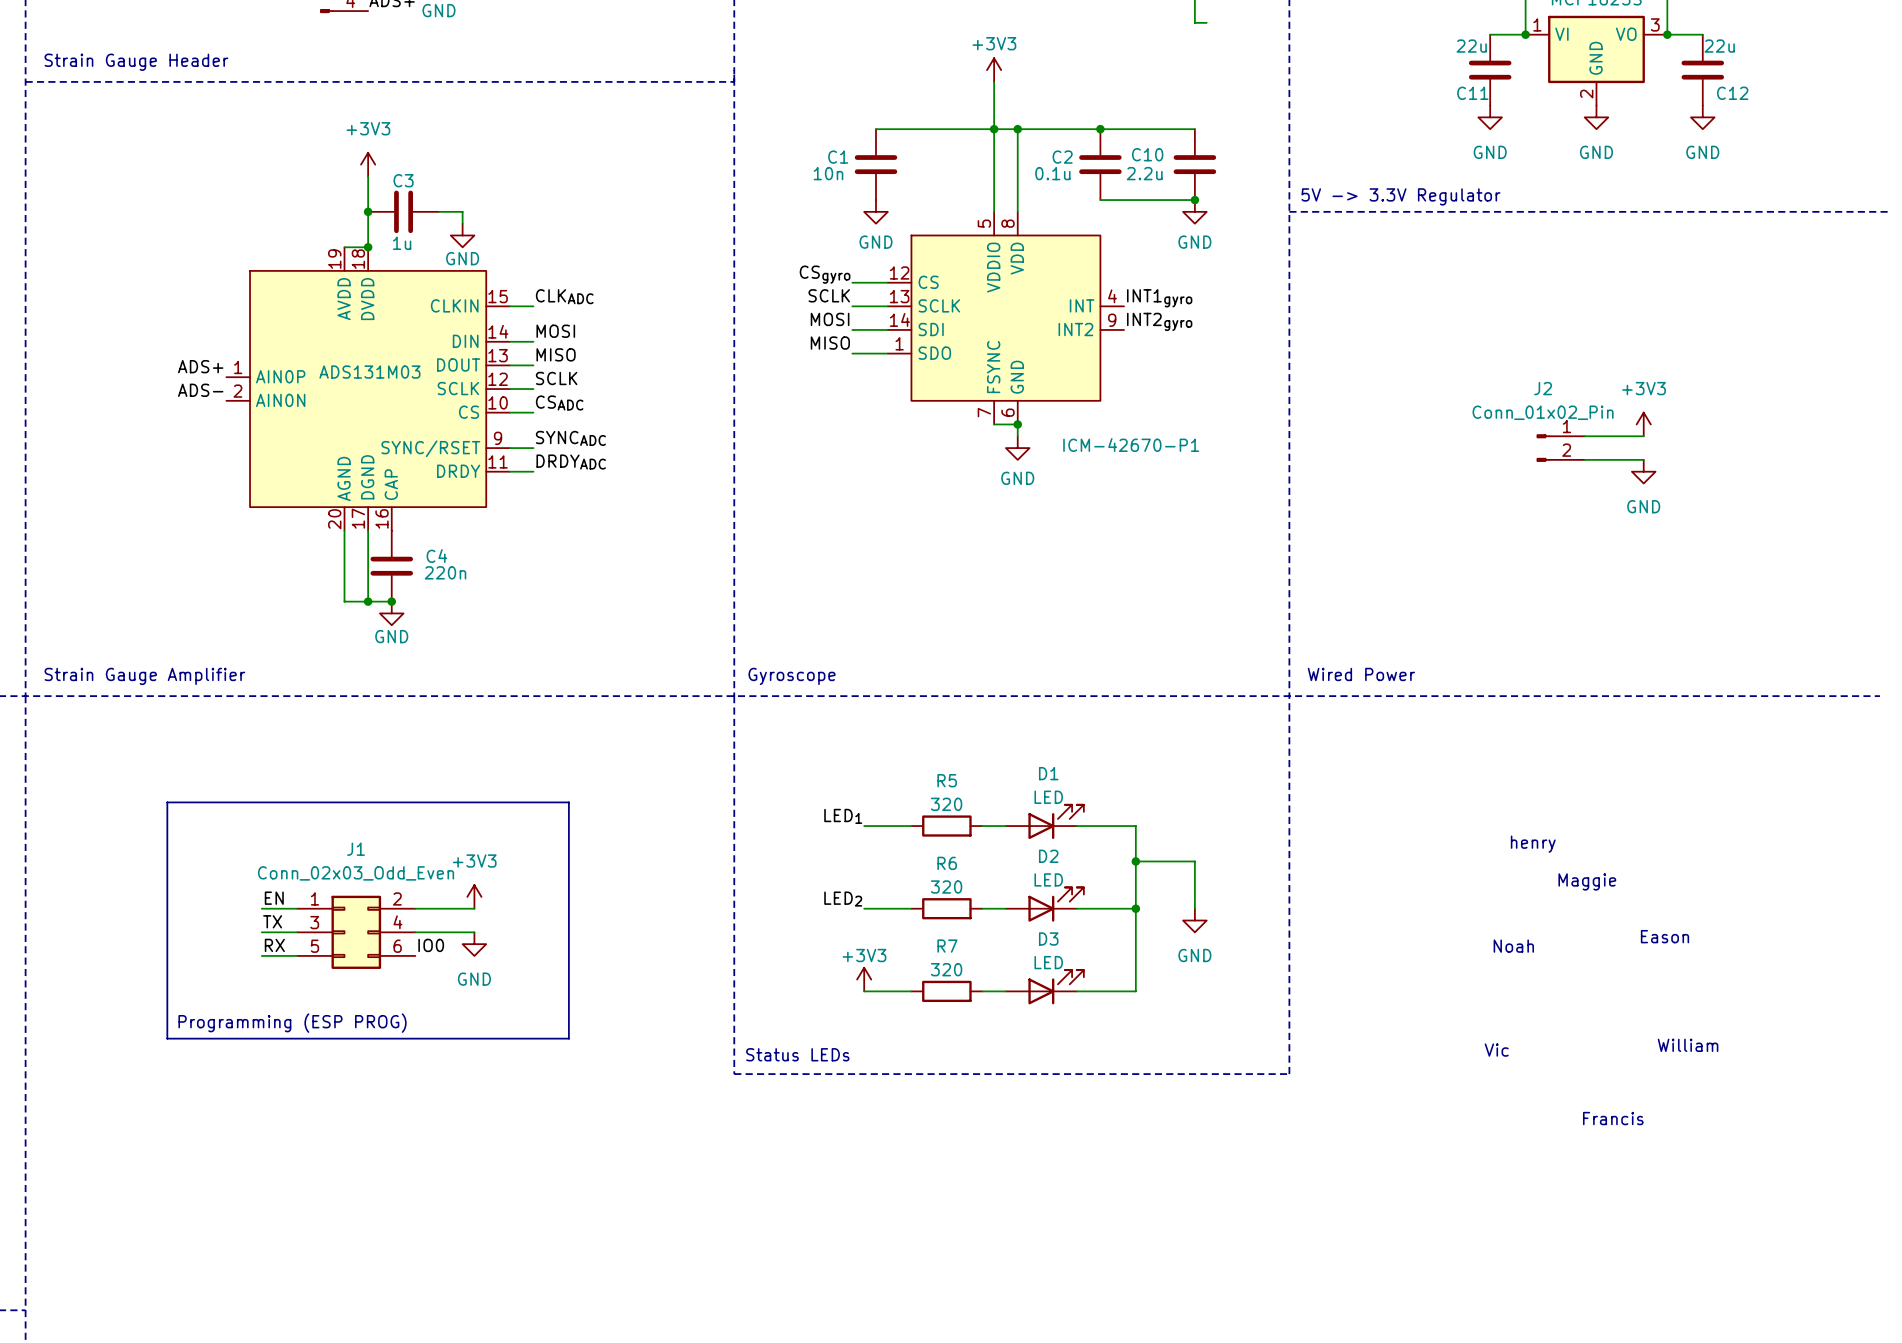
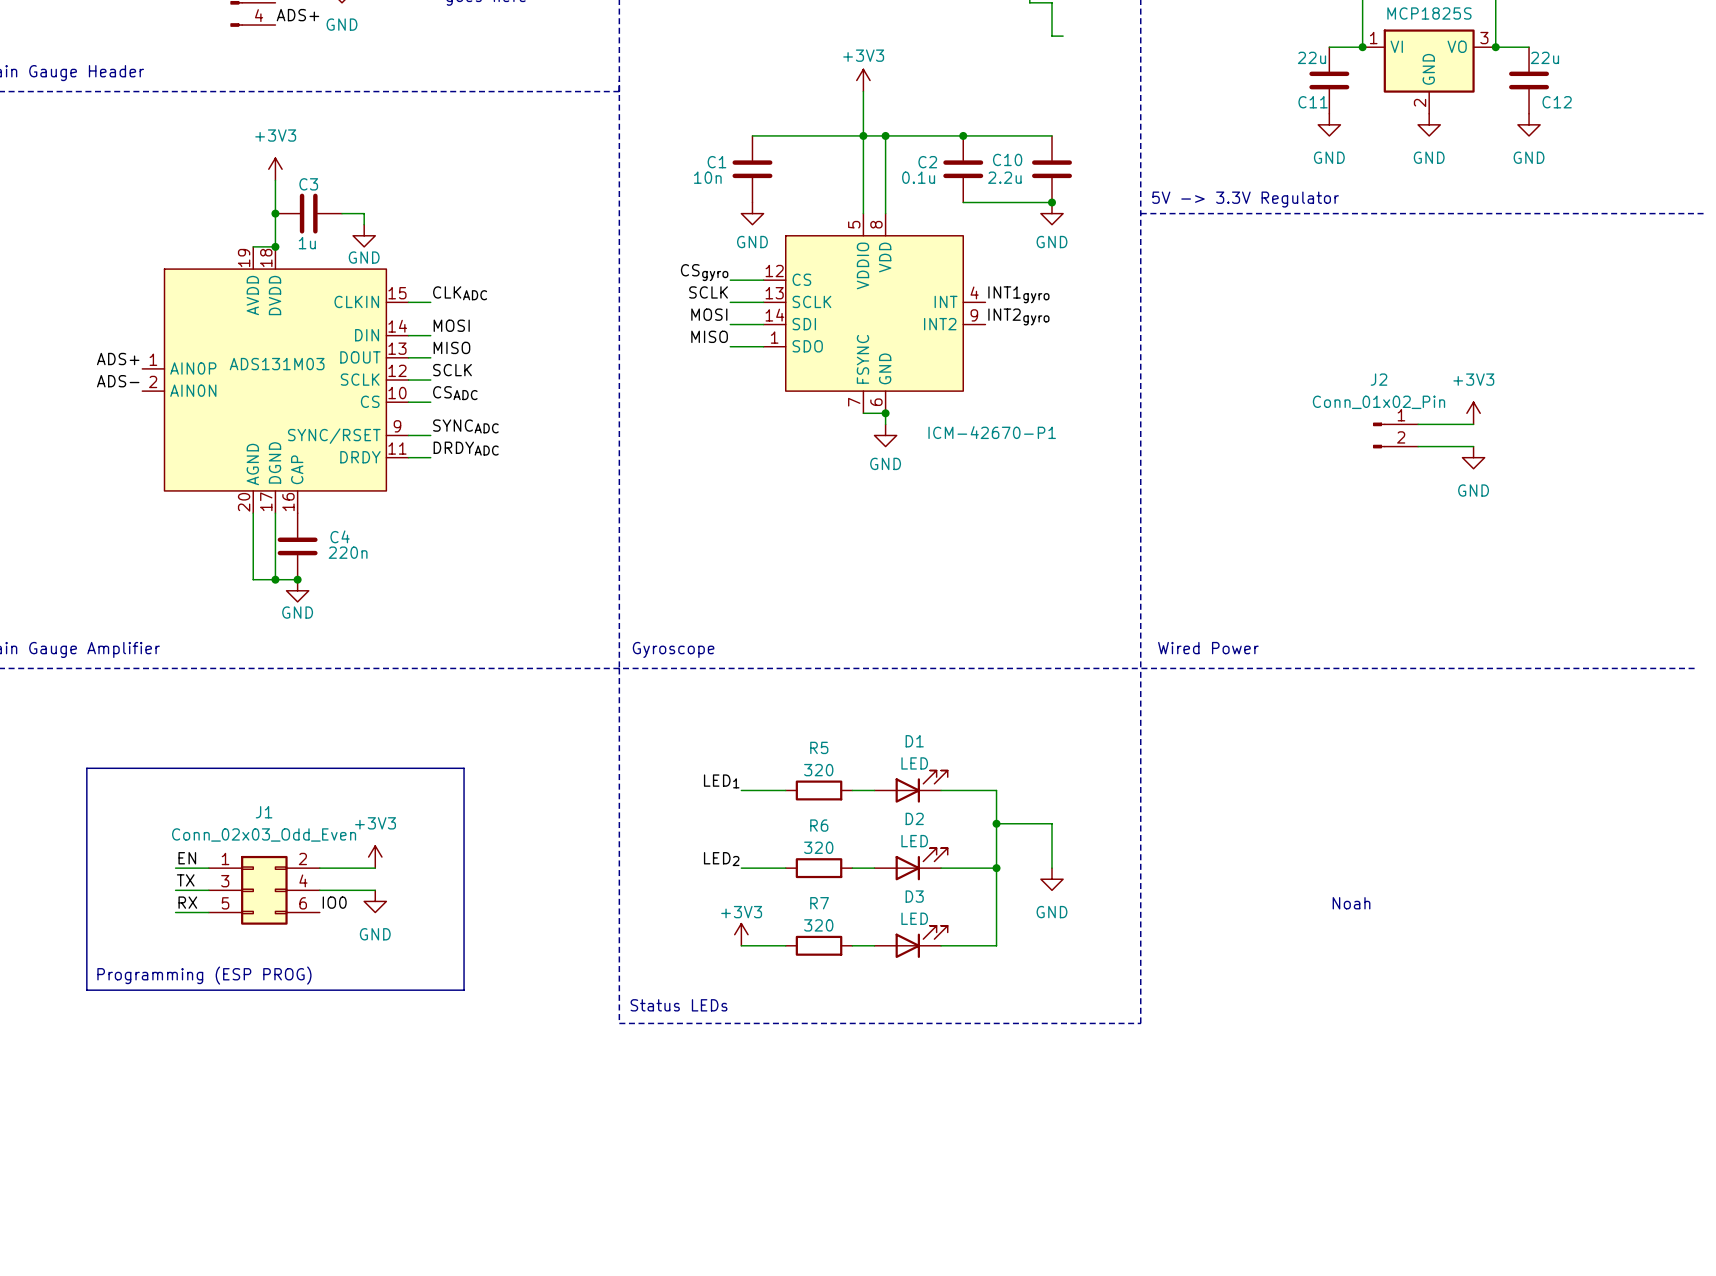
text: henry (1533, 844) -> none
text: Maggie (1587, 881) -> none
text: Eason (1664, 936) -> none
text: William (1688, 1045) -> none
text: Vic (1496, 1050) -> none
text: Francis (1613, 1118) -> none

